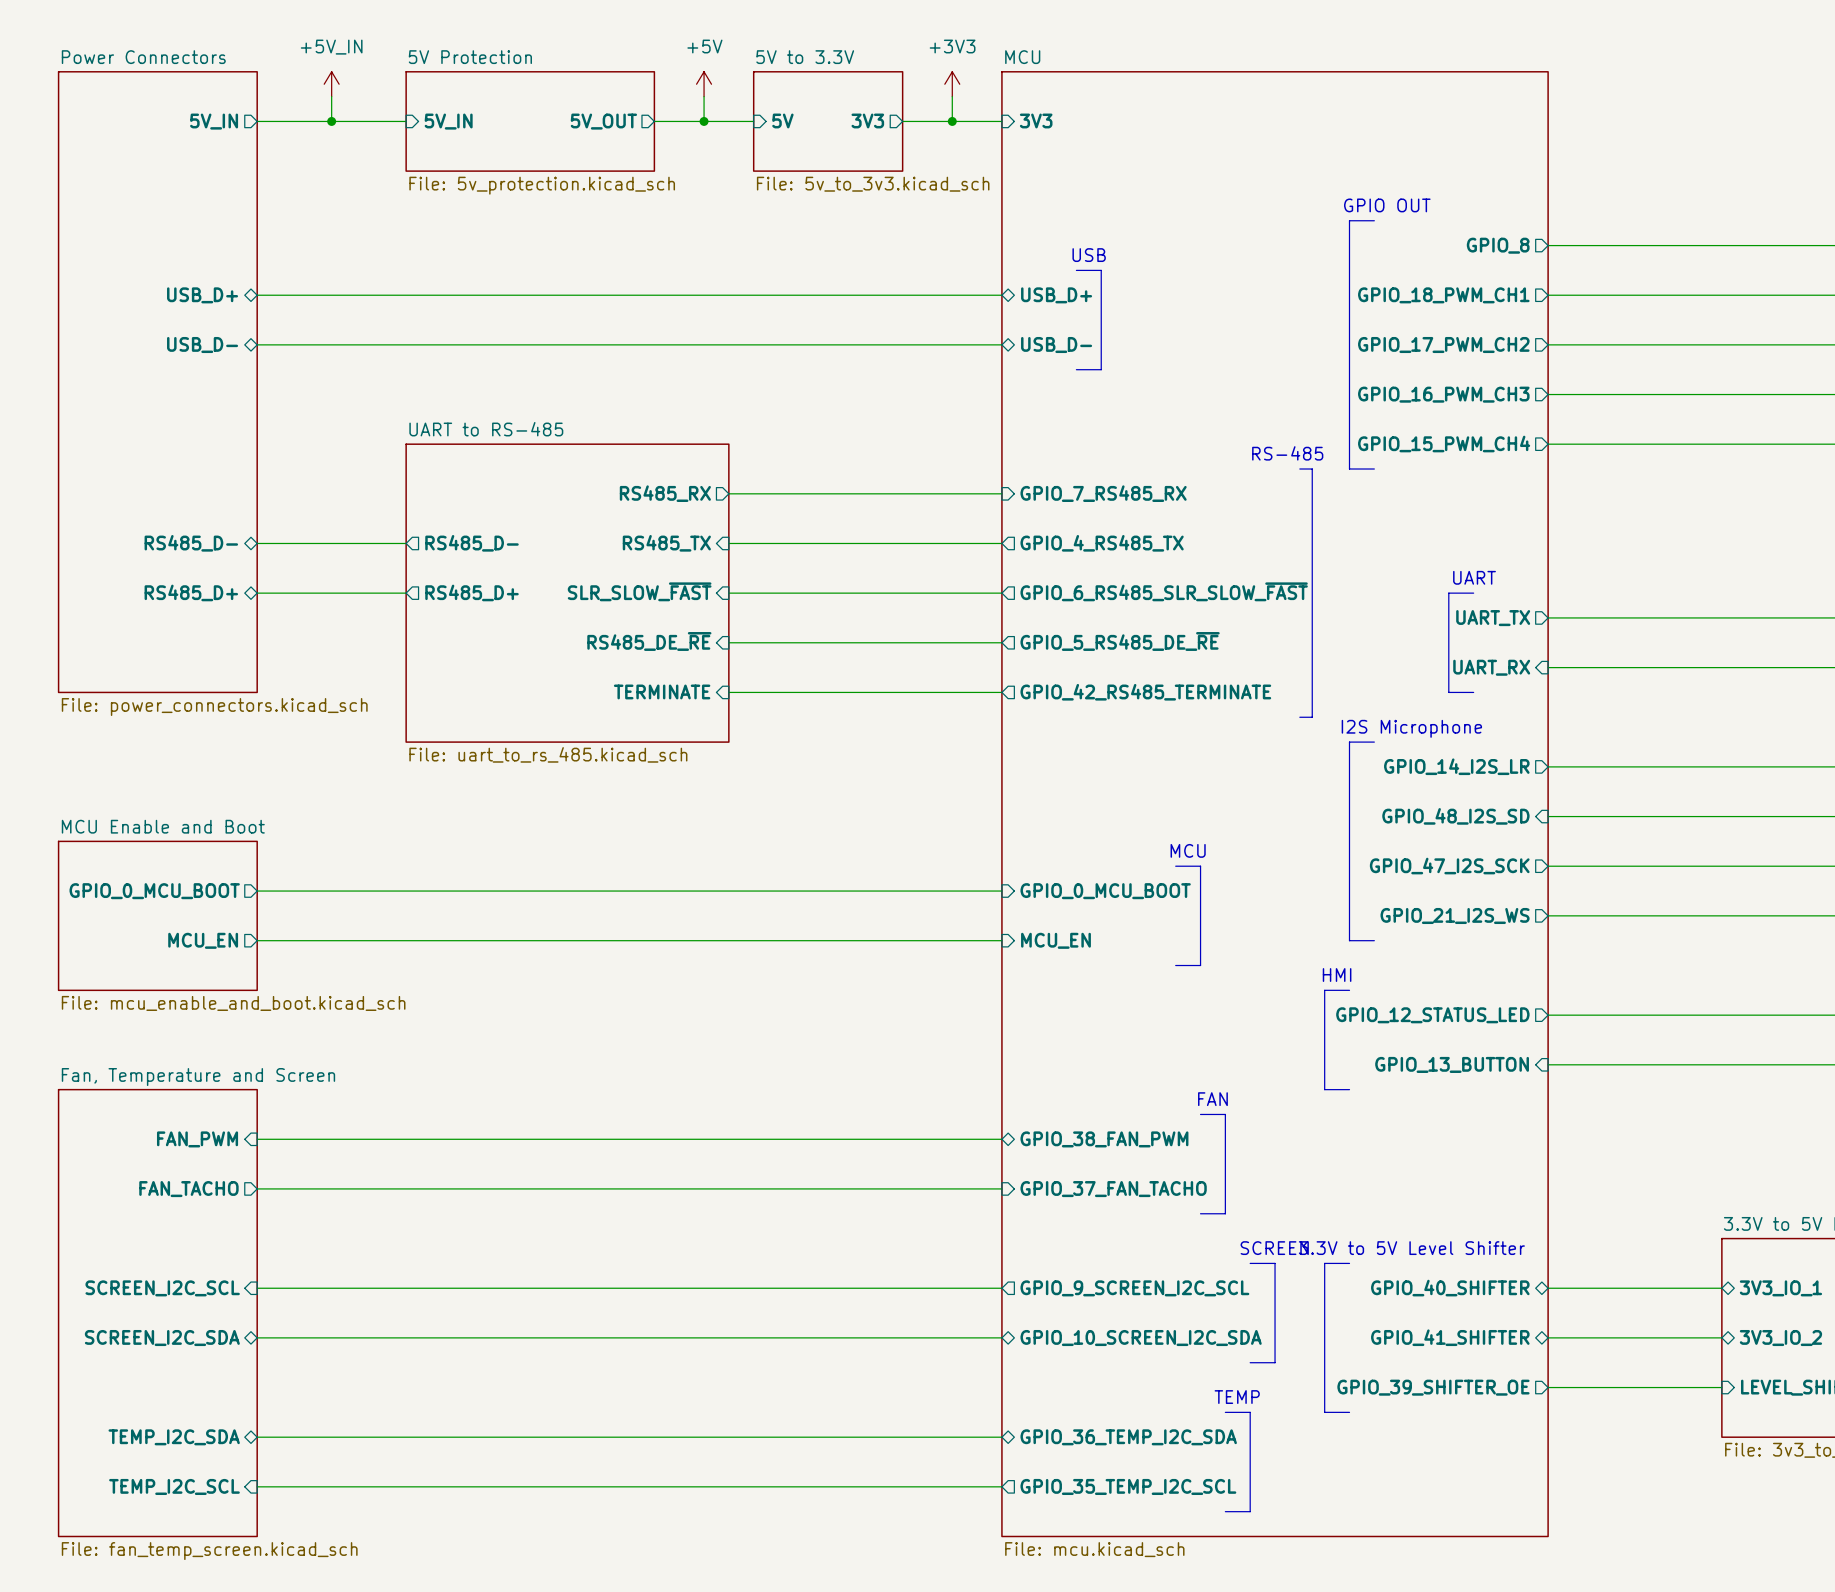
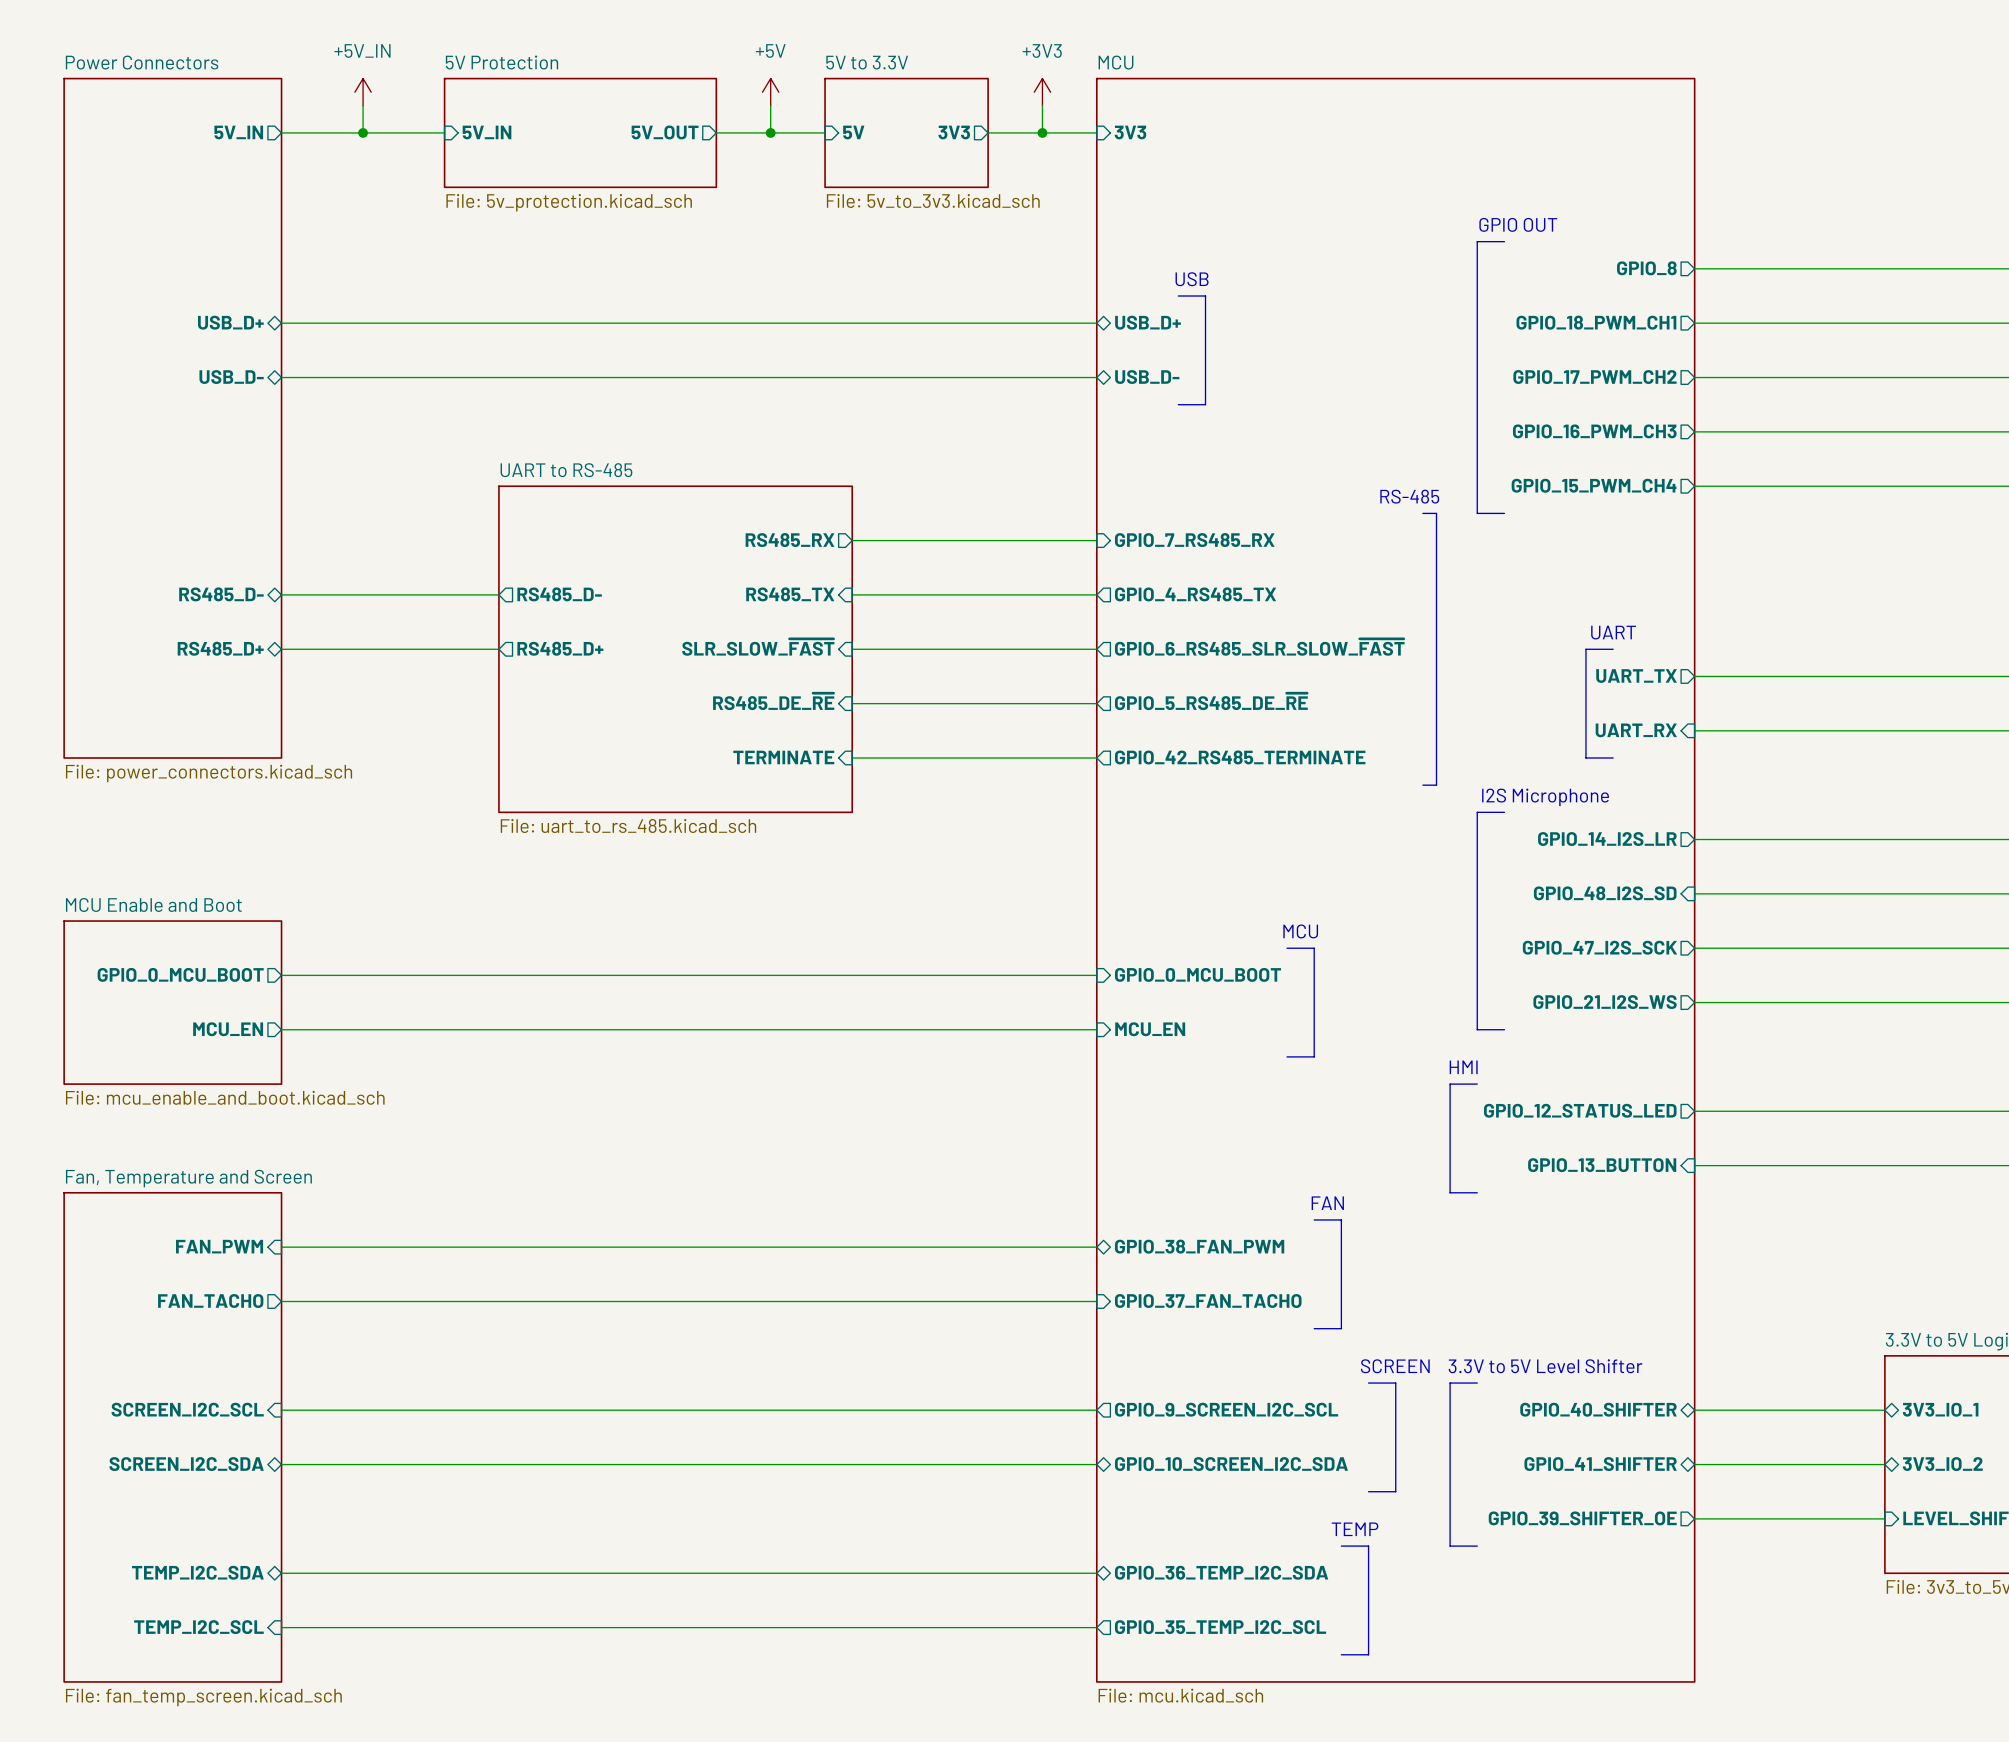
sheet pin position: RS485_RX (665, 493) -> RS485_RX (790, 540)
wire: (728, 493) (778, 493) -> none
wire: none -> (444, 594) (498, 594)
sheet pin position: RS485_D- (472, 543) -> RS485_D- (559, 594)
sheet pin position: RS485_TX (666, 543) -> RS485_TX (790, 594)
wire: (728, 543) (778, 543) -> none
sheet pin position: SLR_SLOW_~{FAST} (639, 591) -> SLR_SLOW_~{FAST} (758, 647)
sheet pin position: RS485_D+ (472, 592) -> RS485_D+ (560, 648)
wire: none -> (444, 649) (498, 649)
sheet UART to RS-485 position: (567, 593) -> (675, 649)
wire: (728, 593) (778, 593) -> none
sheet pin position: RS485_DE_~{RE} (649, 641) -> RS485_DE_~{RE} (773, 701)
wire: (728, 642) (778, 642) -> none
sheet pin position: TERMINATE (662, 691) -> TERMINATE (783, 757)
wire: (728, 692) (778, 692) -> none

